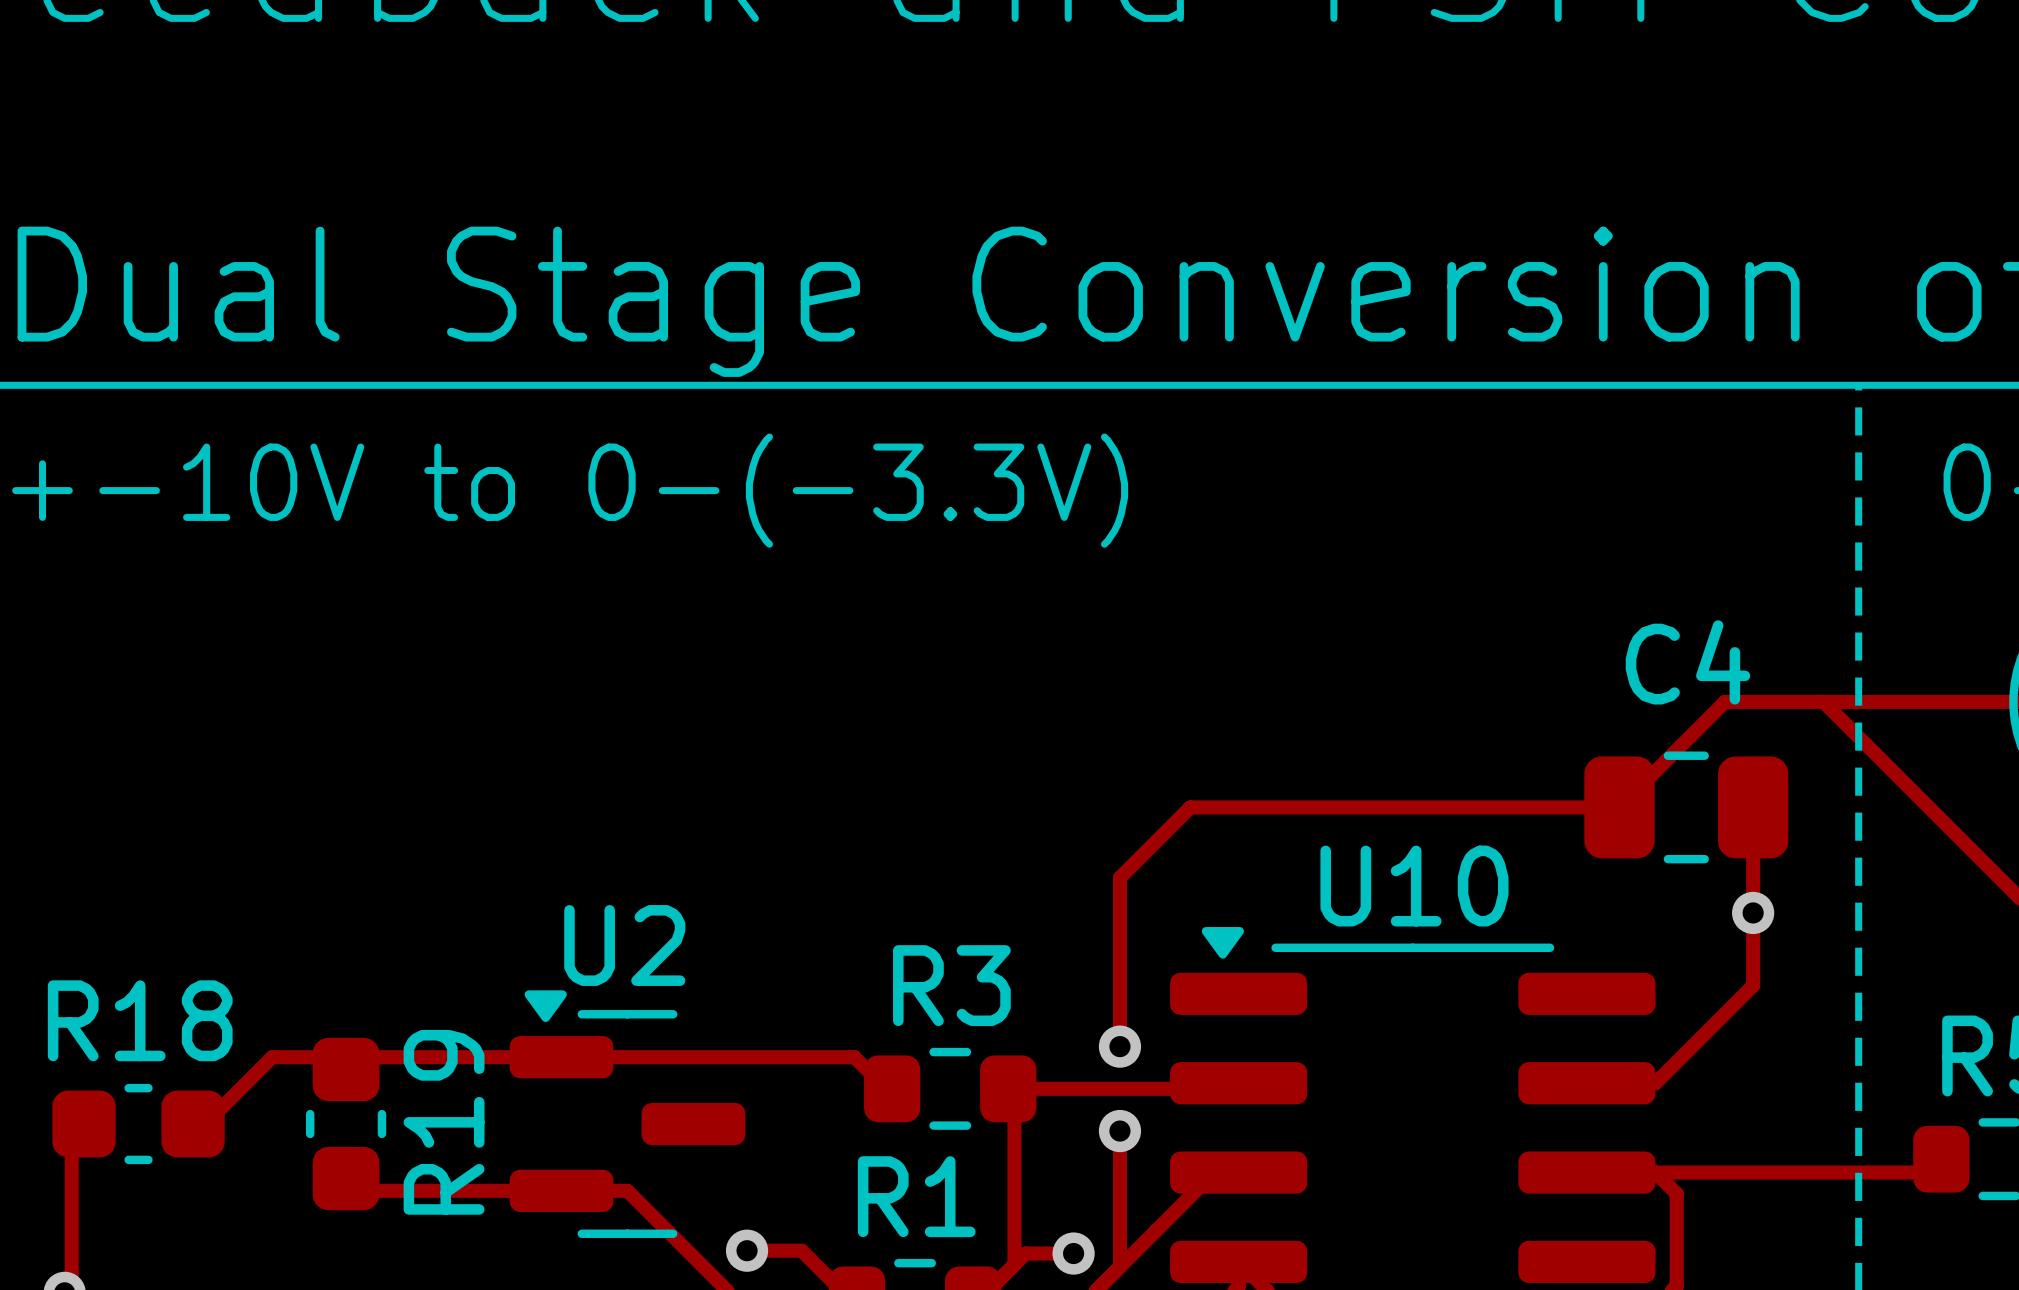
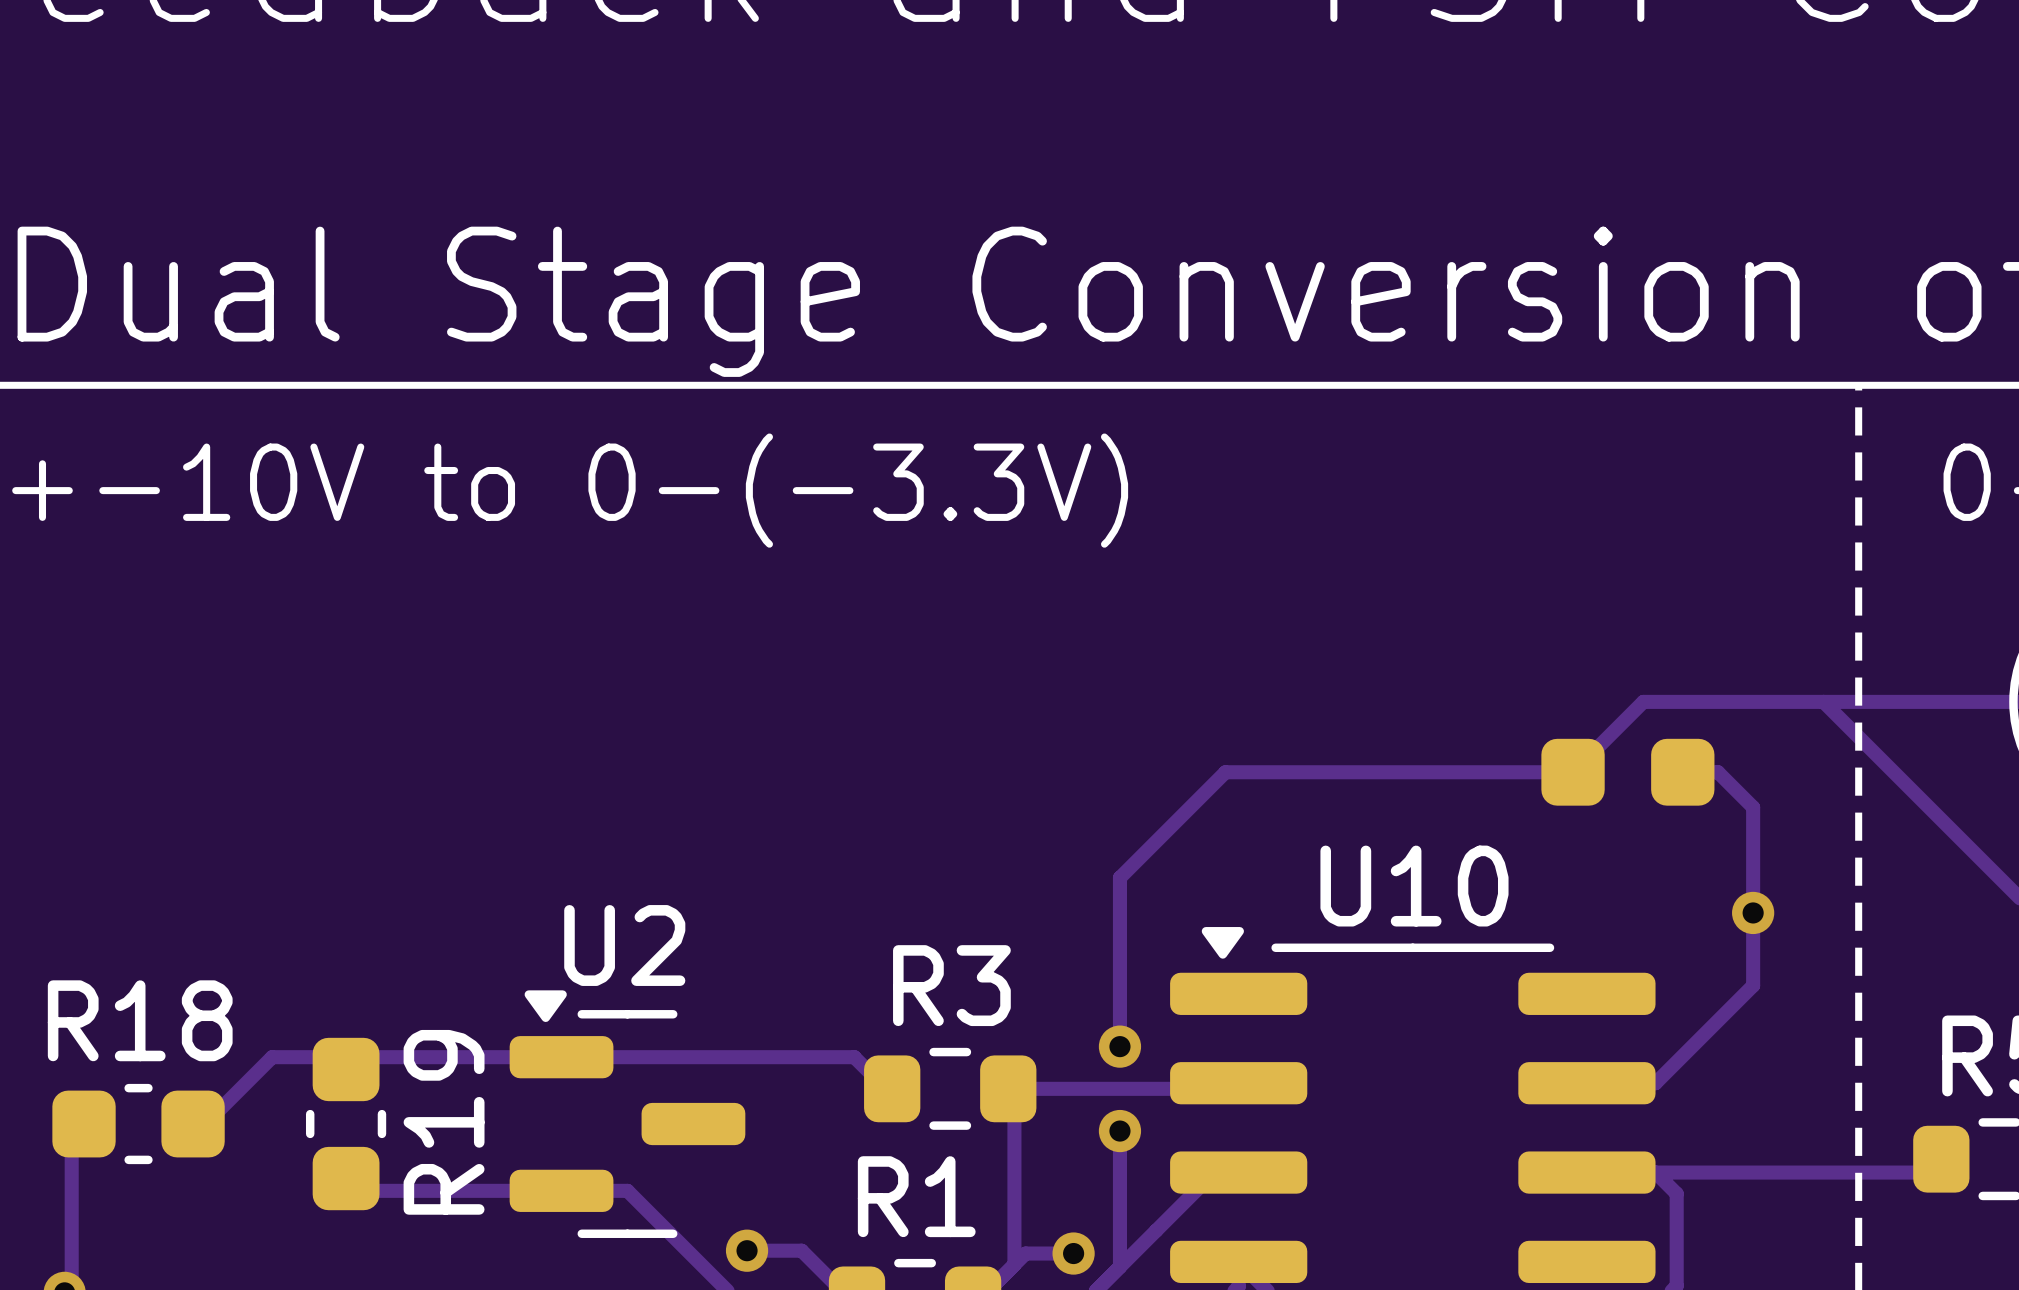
track: (1725, 701) (1619, 807) (1190, 807) -> (1725, 701) (1643, 701) (1573, 772) (1225, 772) (1190, 807)
part: none -> (1627, 772)
track: none -> (1682, 772) (1717, 772) (1753, 807)
C4: (1686, 807) -> none

